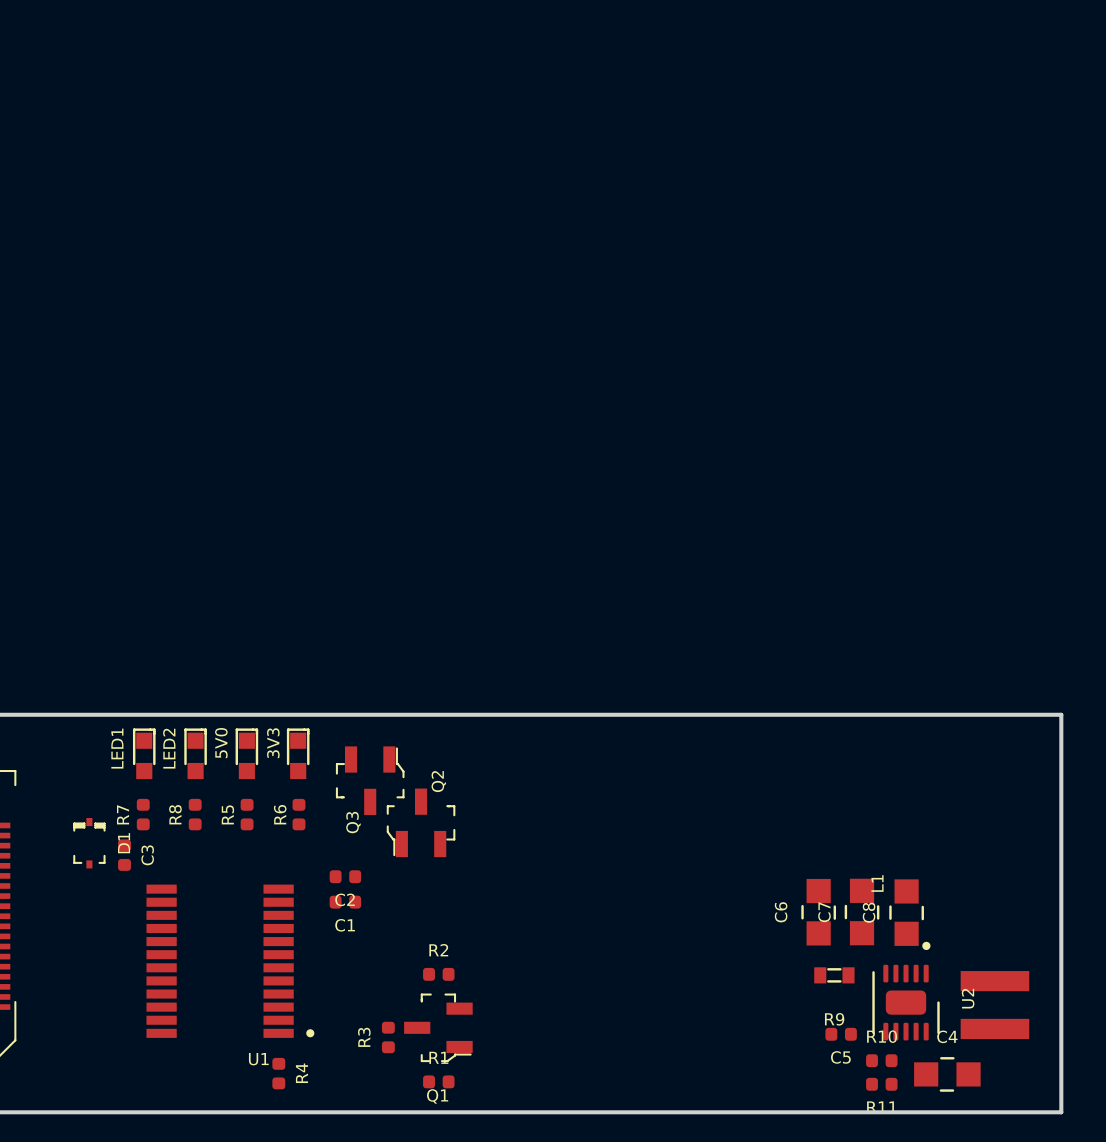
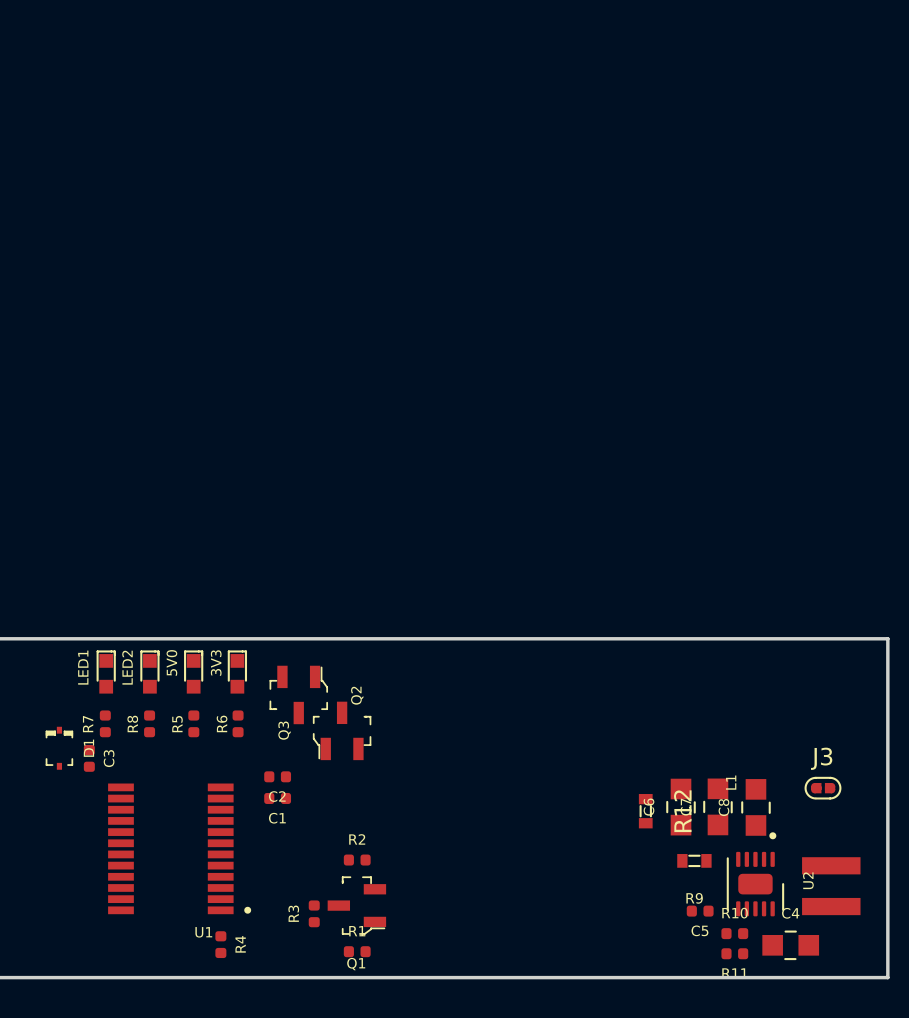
J3: none -> (822, 788)
R12: none -> (645, 811)

